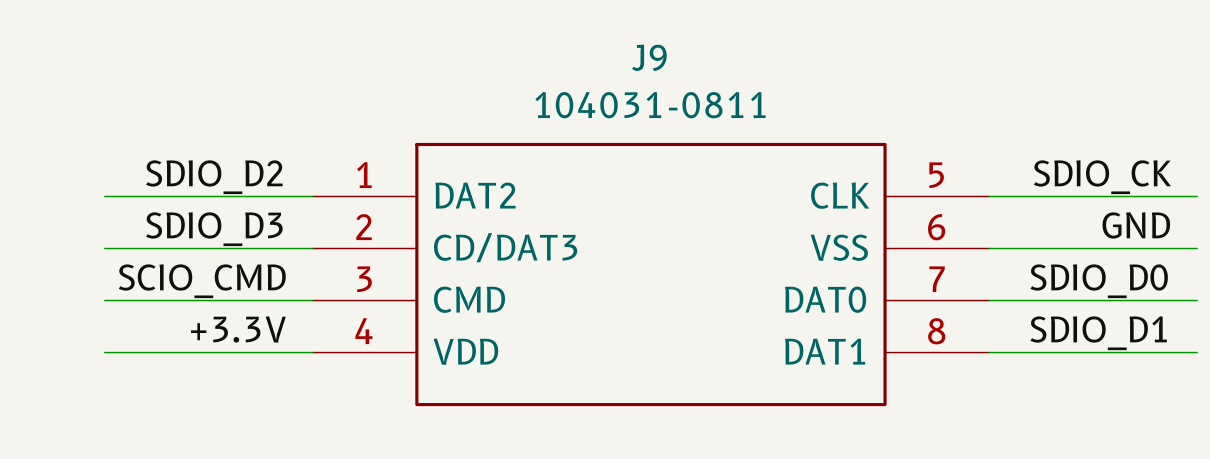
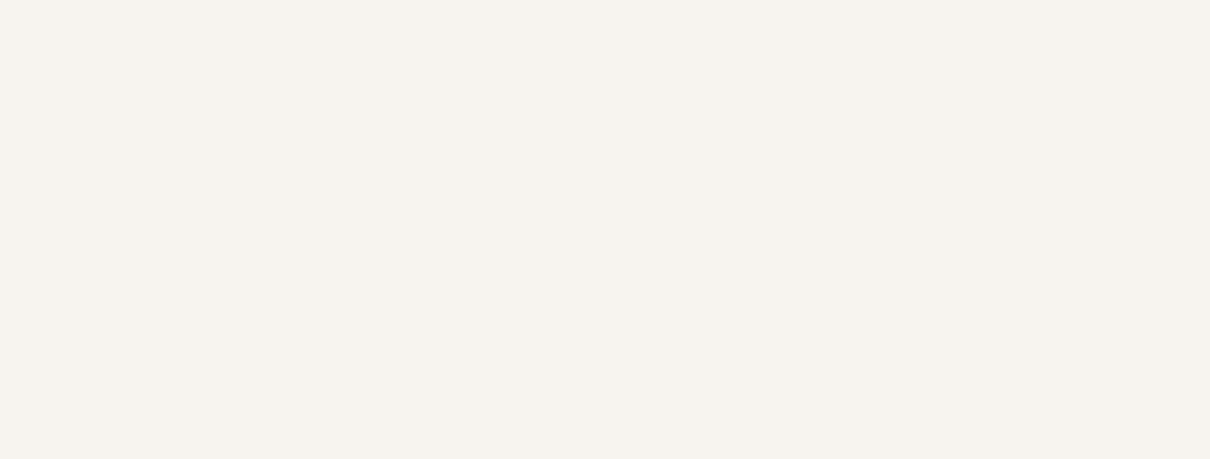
label: SDIO_D2 (214, 177) -> none
label: SDIO_CK (1102, 177) -> none
wire: (104, 196) (312, 196) -> none
wire: (989, 196) (1197, 196) -> none
label: GND (1136, 225) -> none
label: SDIO_D3 (214, 229) -> none
wire: (104, 248) (312, 248) -> none
wire: (989, 248) (1197, 248) -> none
J9: 104031-0811 (650, 274) -> none
label: SCIO_CMD (202, 281) -> none
label: SDIO_D0 (1099, 281) -> none
wire: (104, 300) (312, 300) -> none
wire: (989, 300) (1197, 300) -> none
label: +3.3V (238, 329) -> none
label: SDIO_D1 (1098, 333) -> none
wire: (104, 352) (312, 352) -> none
wire: (989, 352) (1197, 352) -> none

